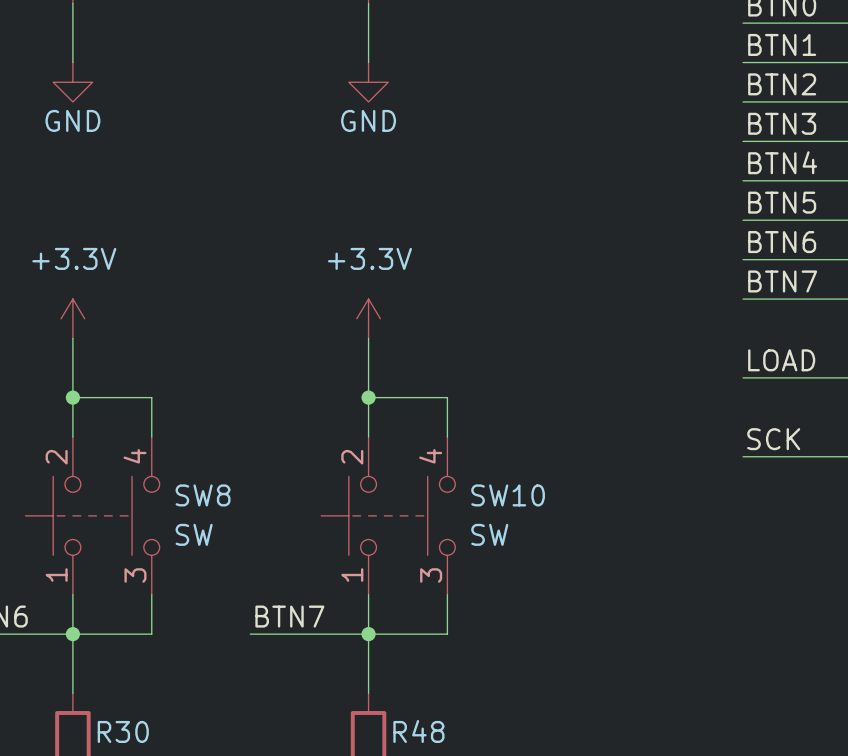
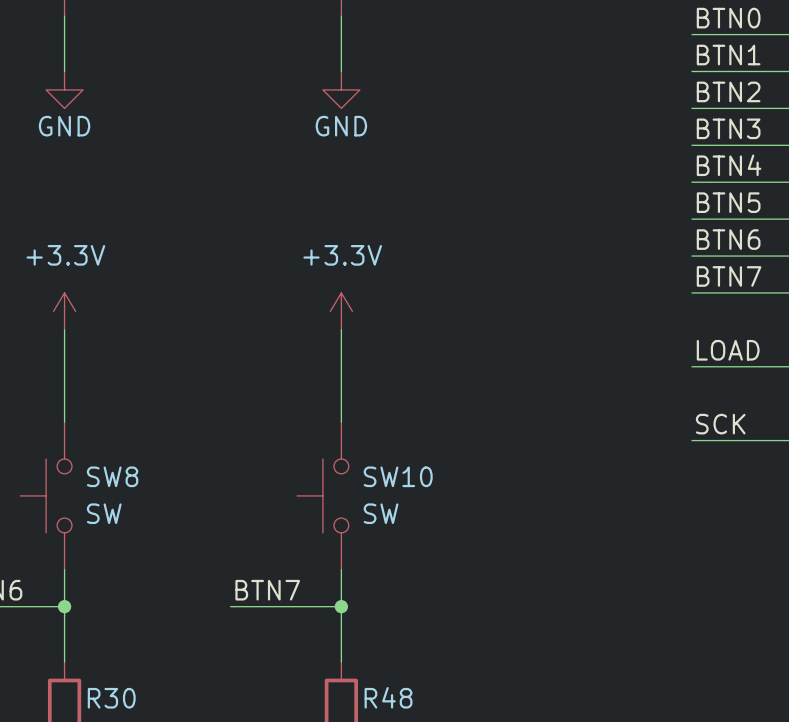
wire: (72, 397) (151, 397) (151, 437) -> none
junction: (72, 397) -> none
wire: (368, 397) (447, 397) (447, 437) -> none
junction: (368, 397) -> none
SW8 symbol: [25, 437, 160, 595] -> [20, 422, 72, 570]
SW10 symbol: [321, 437, 456, 595] -> [297, 422, 349, 570]
SW8 name position: SW8 (203, 495) -> SW8 (112, 476)
SW10 name position: SW10 (508, 495) -> SW10 (398, 476)
SW8 value position: SW (194, 534) -> SW (104, 513)
SW10 value position: SW (489, 534) -> SW (381, 513)
wire: (151, 594) (151, 634) (72, 634) -> none
wire: (447, 594) (447, 634) (368, 634) -> none

